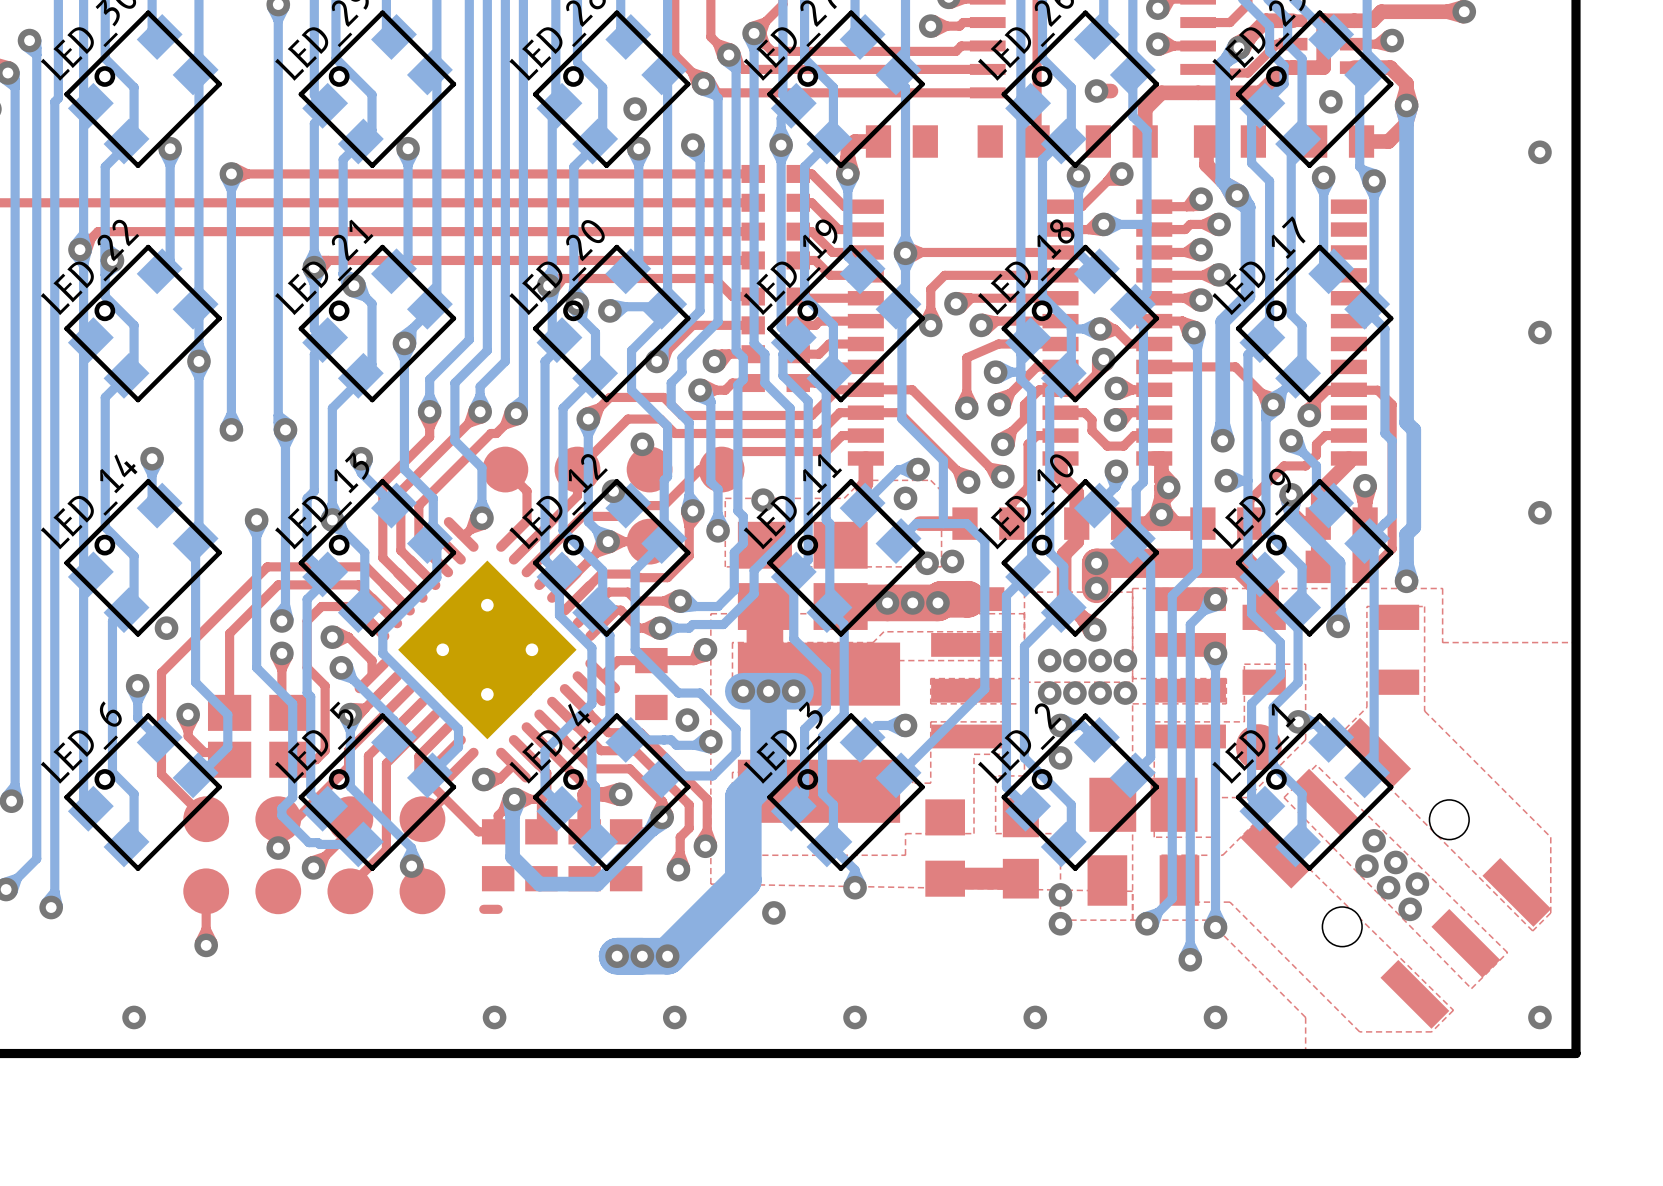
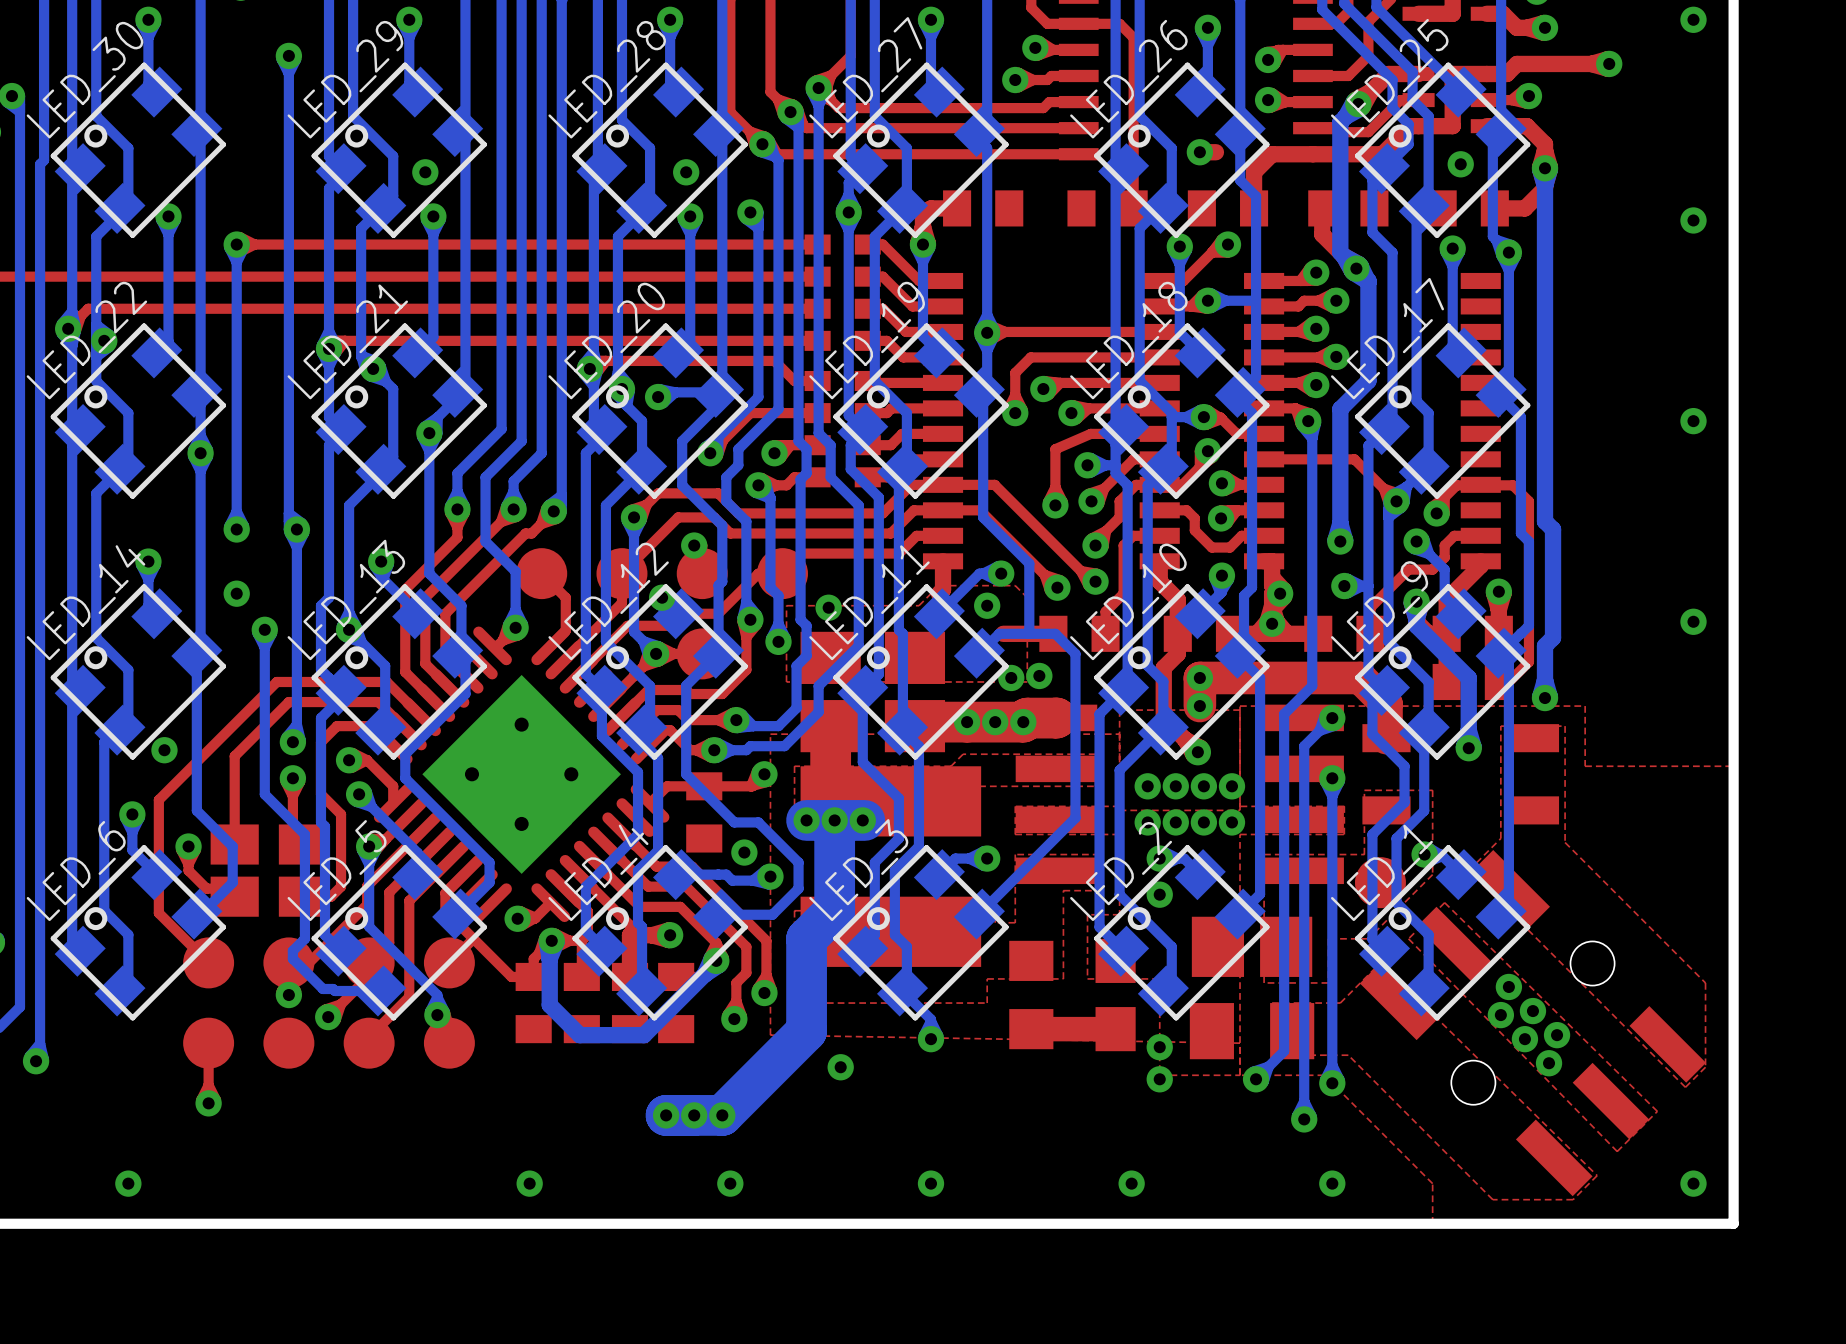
via: none -> (425, 172)
via: none -> (236, 593)
top track: (498, 909) (483, 909) -> none

